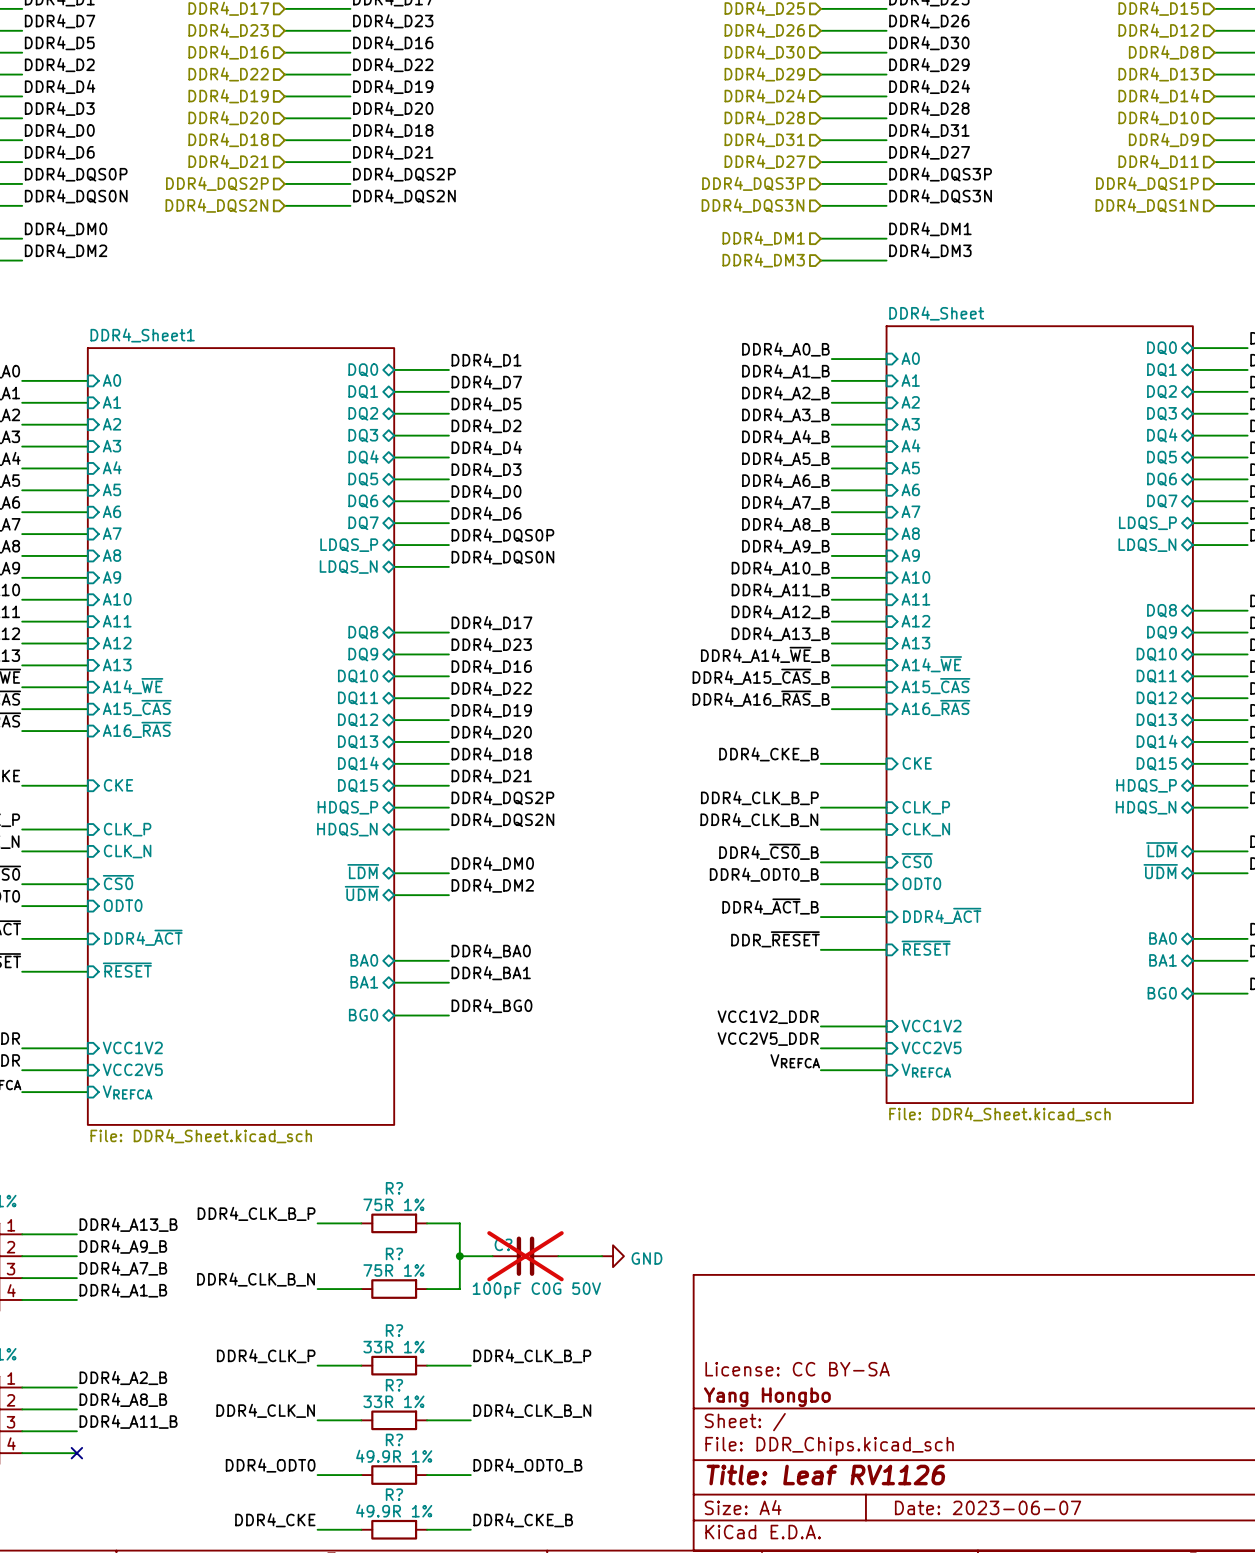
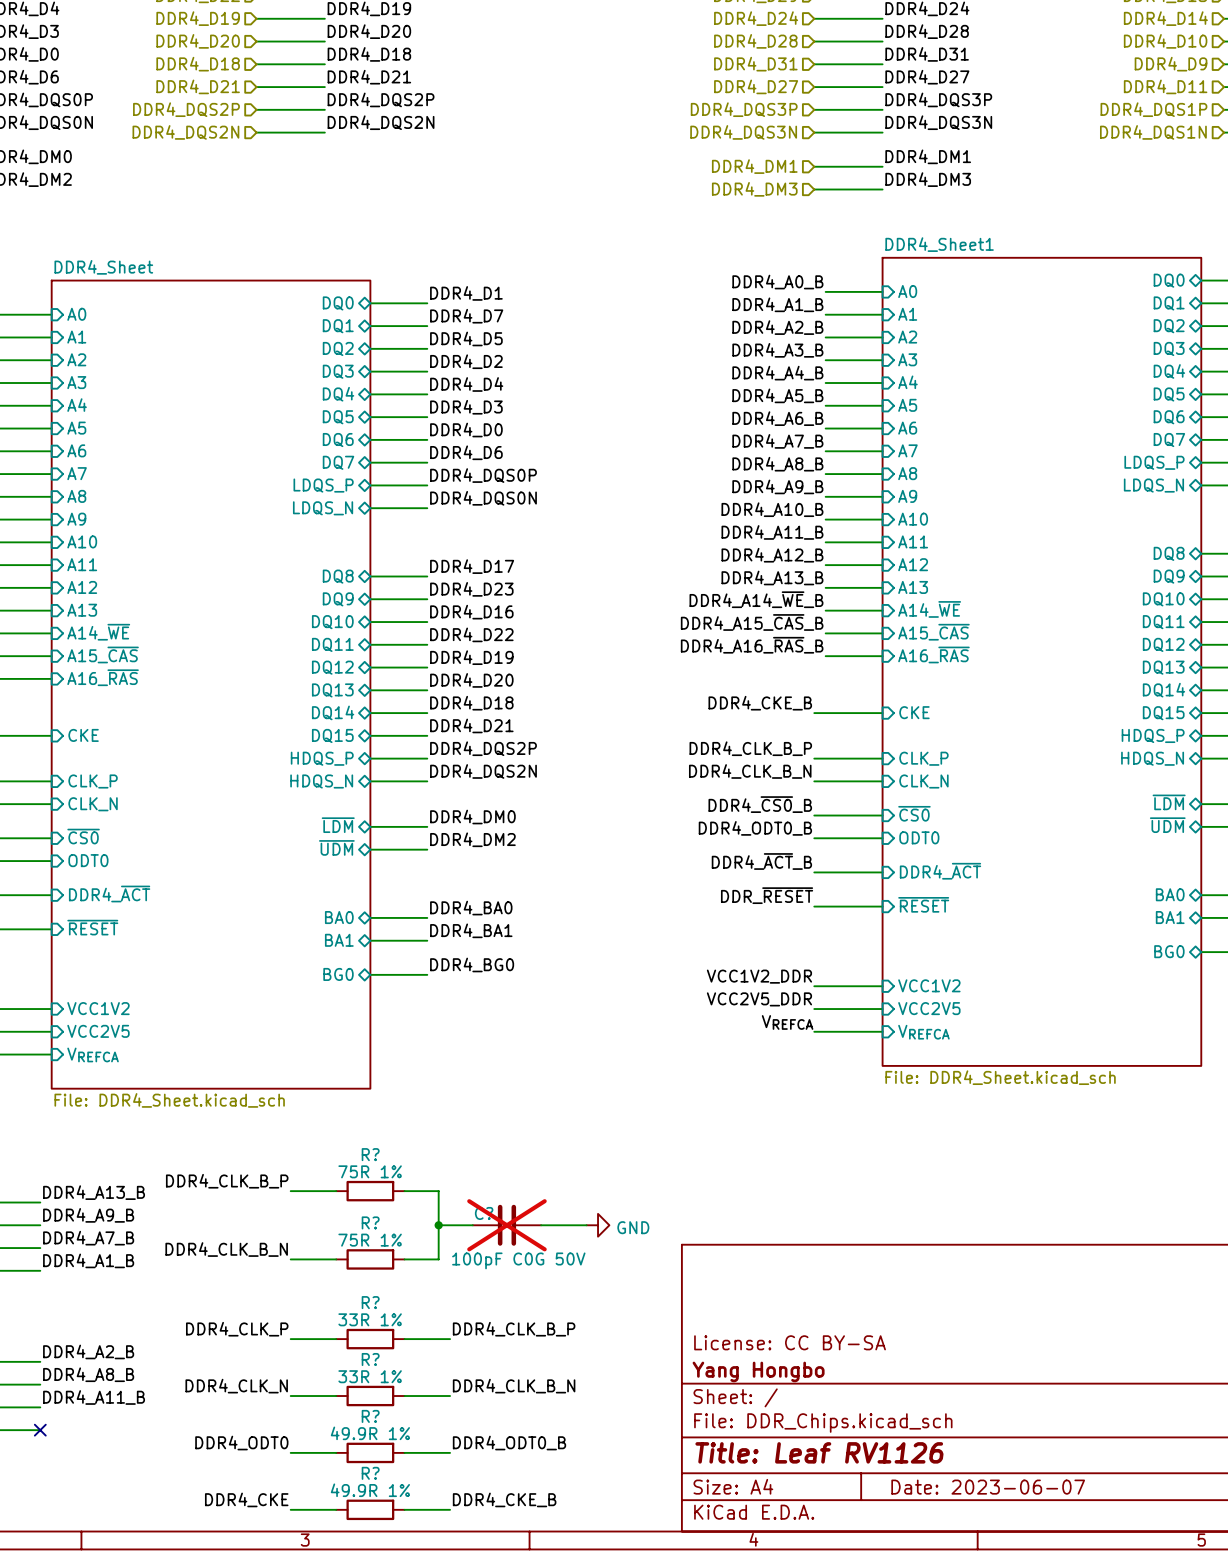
sheet DDR4_Sheet name: DDR4_Sheet (936, 313) -> DDR4_Sheet1 (939, 244)
sheet DDR4_Sheet1 name: DDR4_Sheet1 (142, 335) -> DDR4_Sheet (103, 267)

